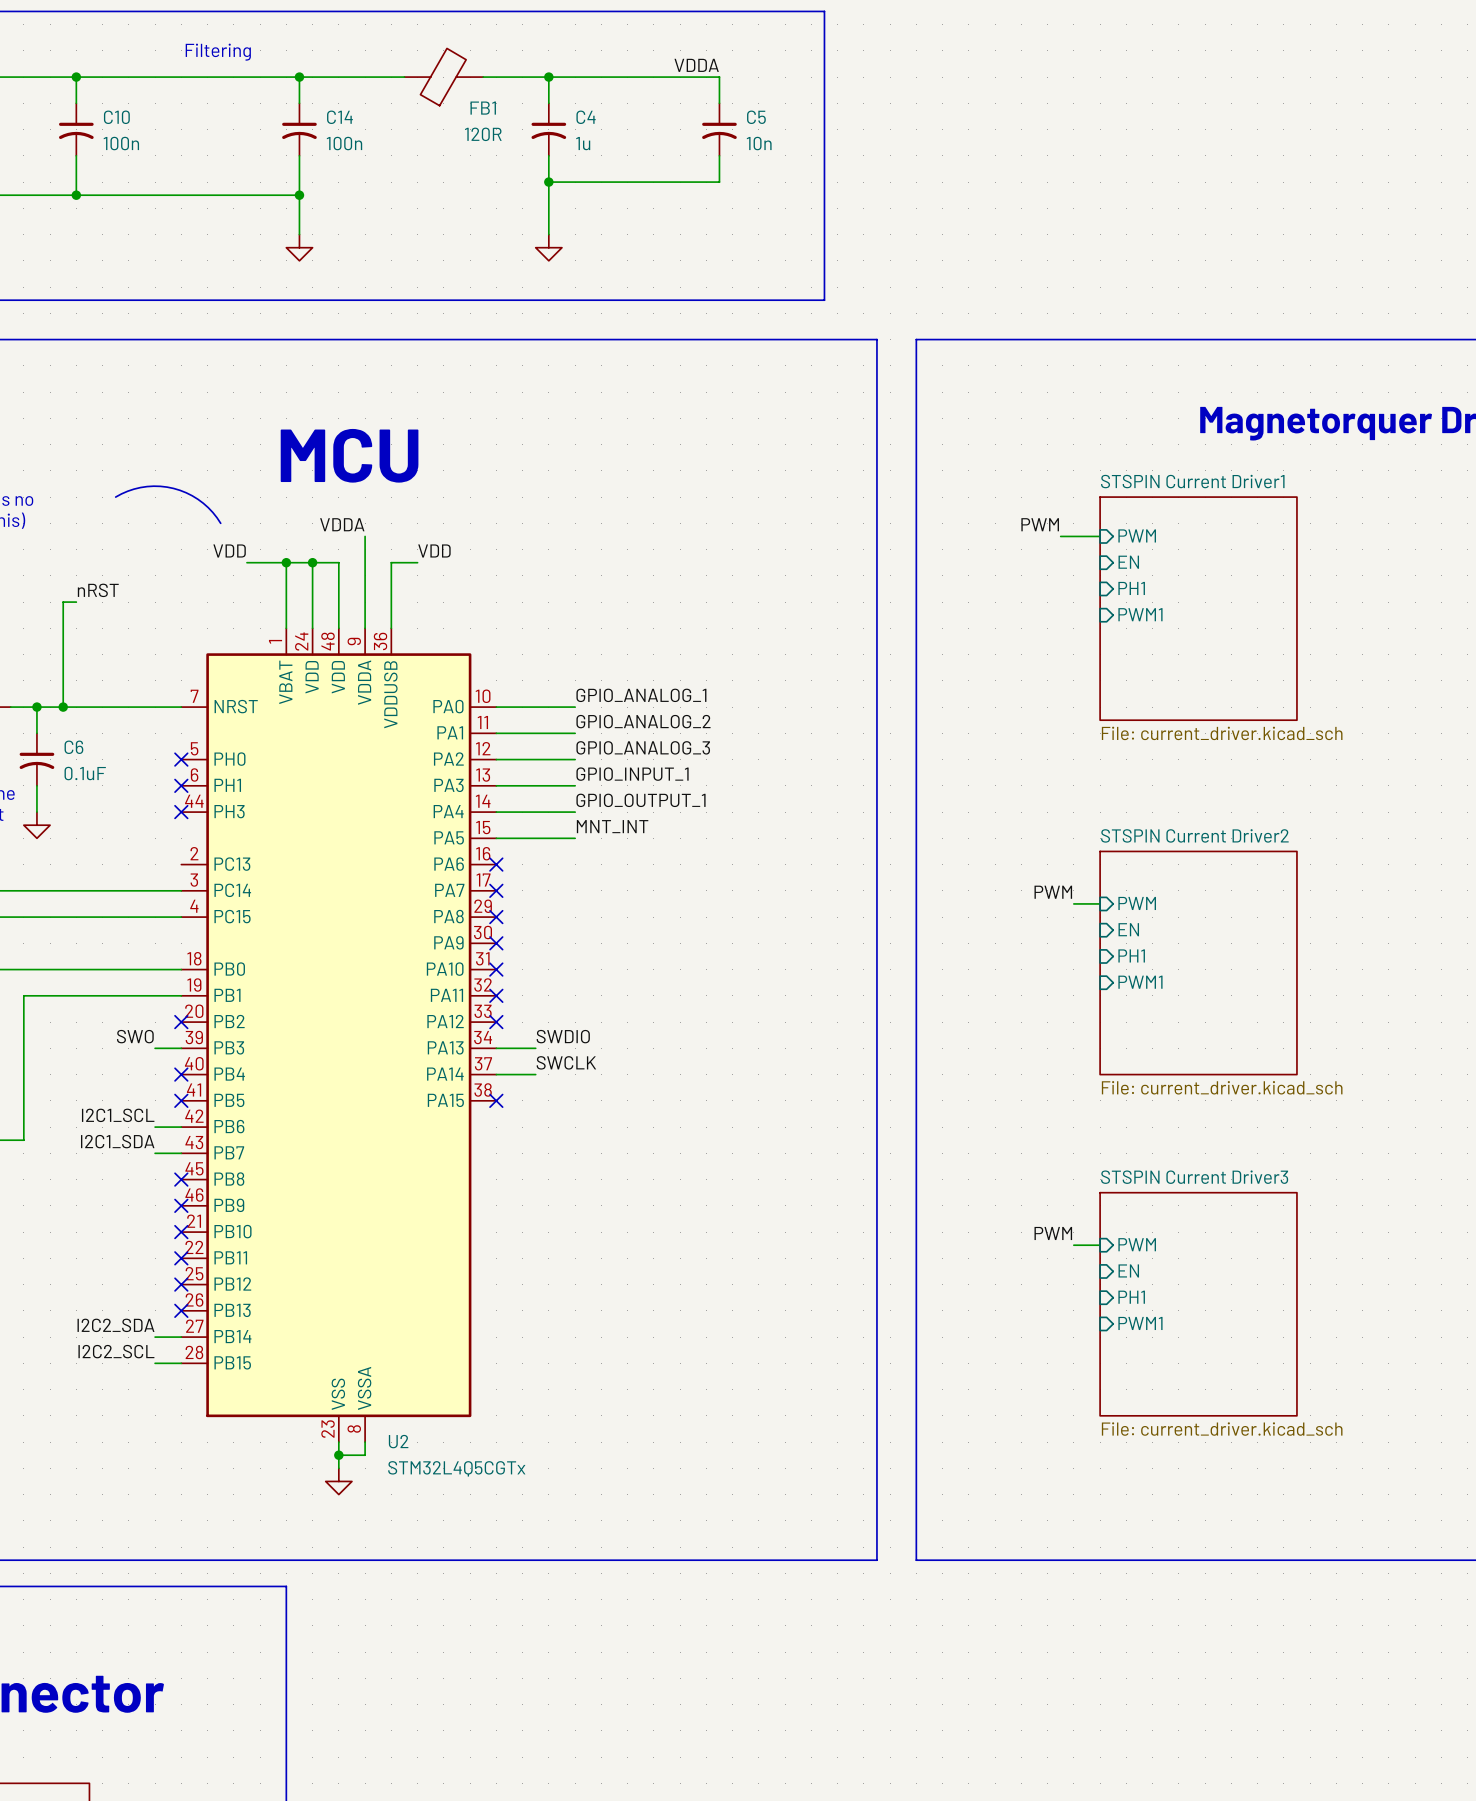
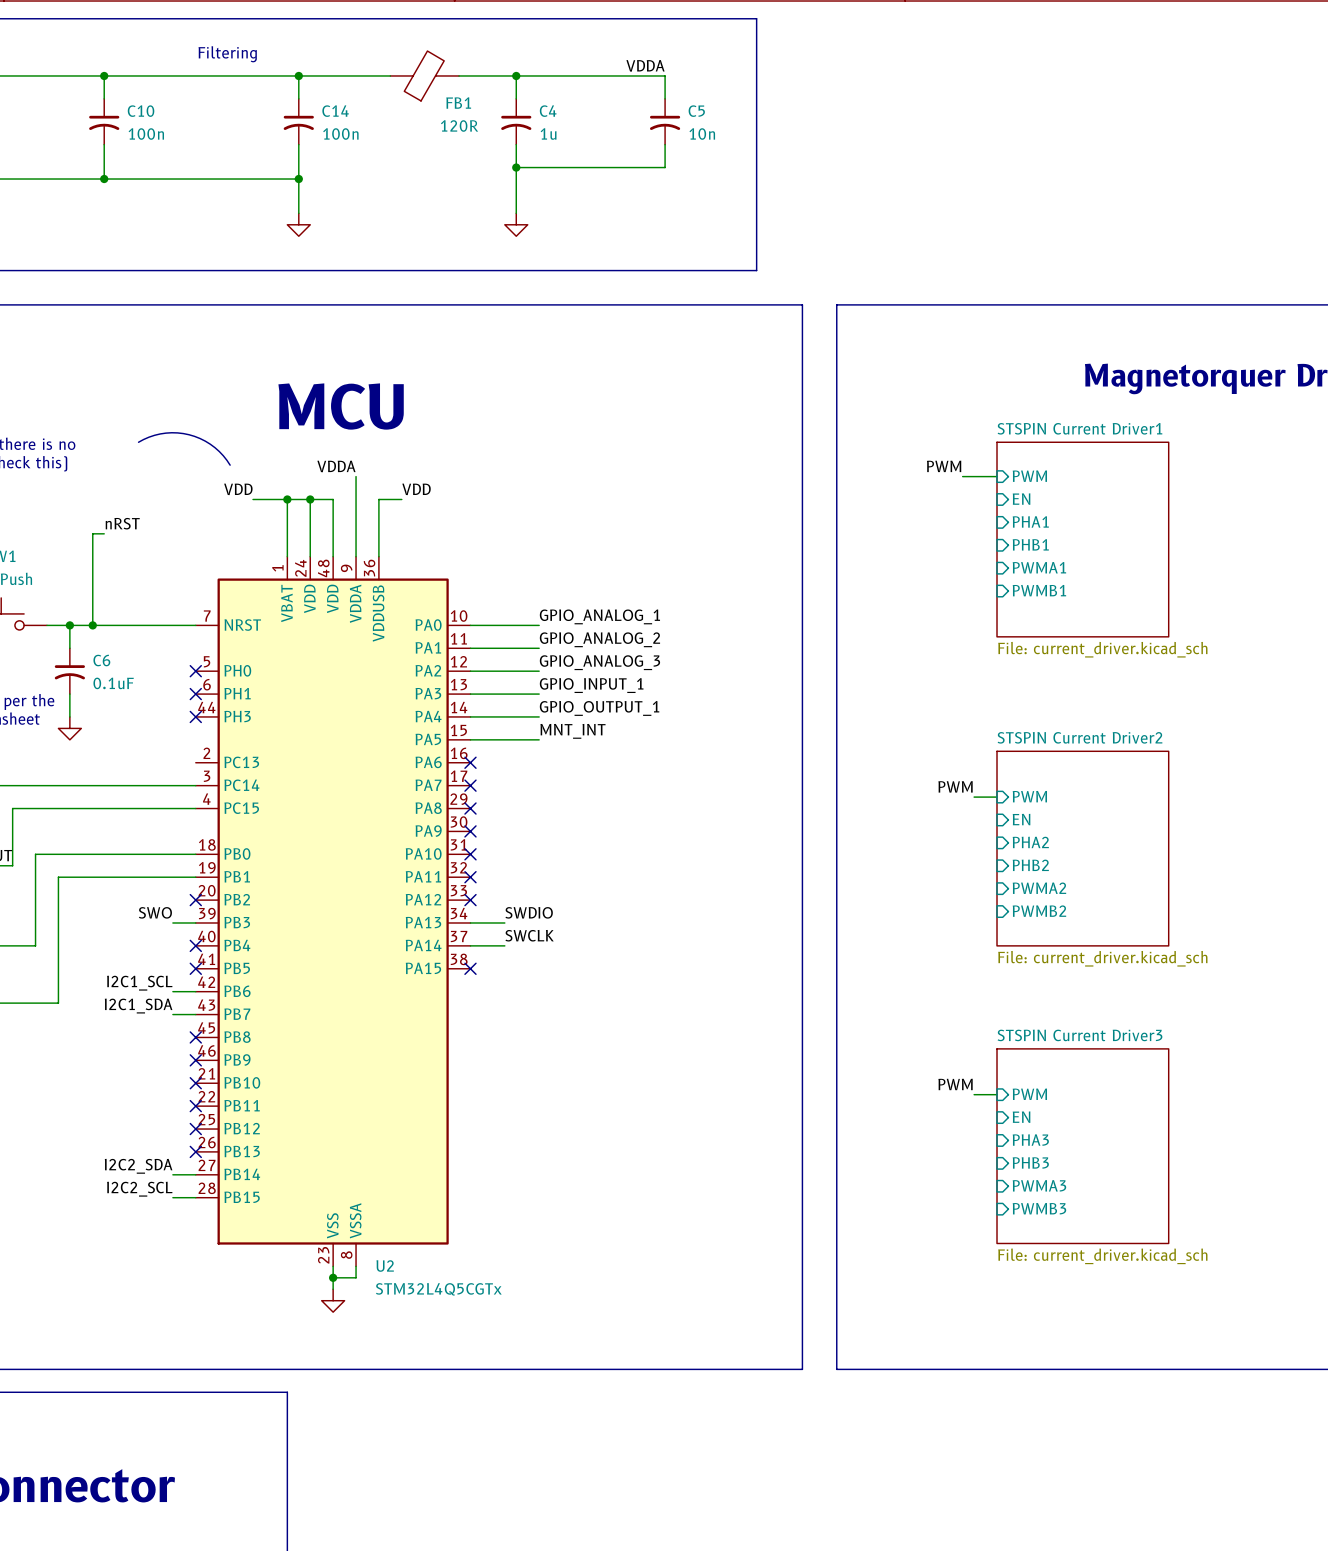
sheet pin: PH1 (1131, 588) -> PHA1 (1030, 521)
sheet pin: PWM1 (1140, 614) -> PHB1 (1030, 544)
sheet pin: none -> PWMA1 (1039, 567)
sheet pin: none -> PWMB1 (1039, 590)
sheet pin: PH1 (1131, 955) -> PHA2 (1030, 842)
sheet pin: PWM1 (1140, 982) -> PHB2 (1030, 865)
sheet pin: none -> PWMA2 (1039, 888)
sheet pin: none -> PWMB2 (1039, 911)
sheet pin: PH1 (1131, 1297) -> PHA3 (1030, 1140)
sheet pin: PWM1 (1140, 1323) -> PHB3 (1030, 1162)
sheet pin: none -> PWMA3 (1039, 1185)
sheet pin: none -> PWMB3 (1039, 1208)

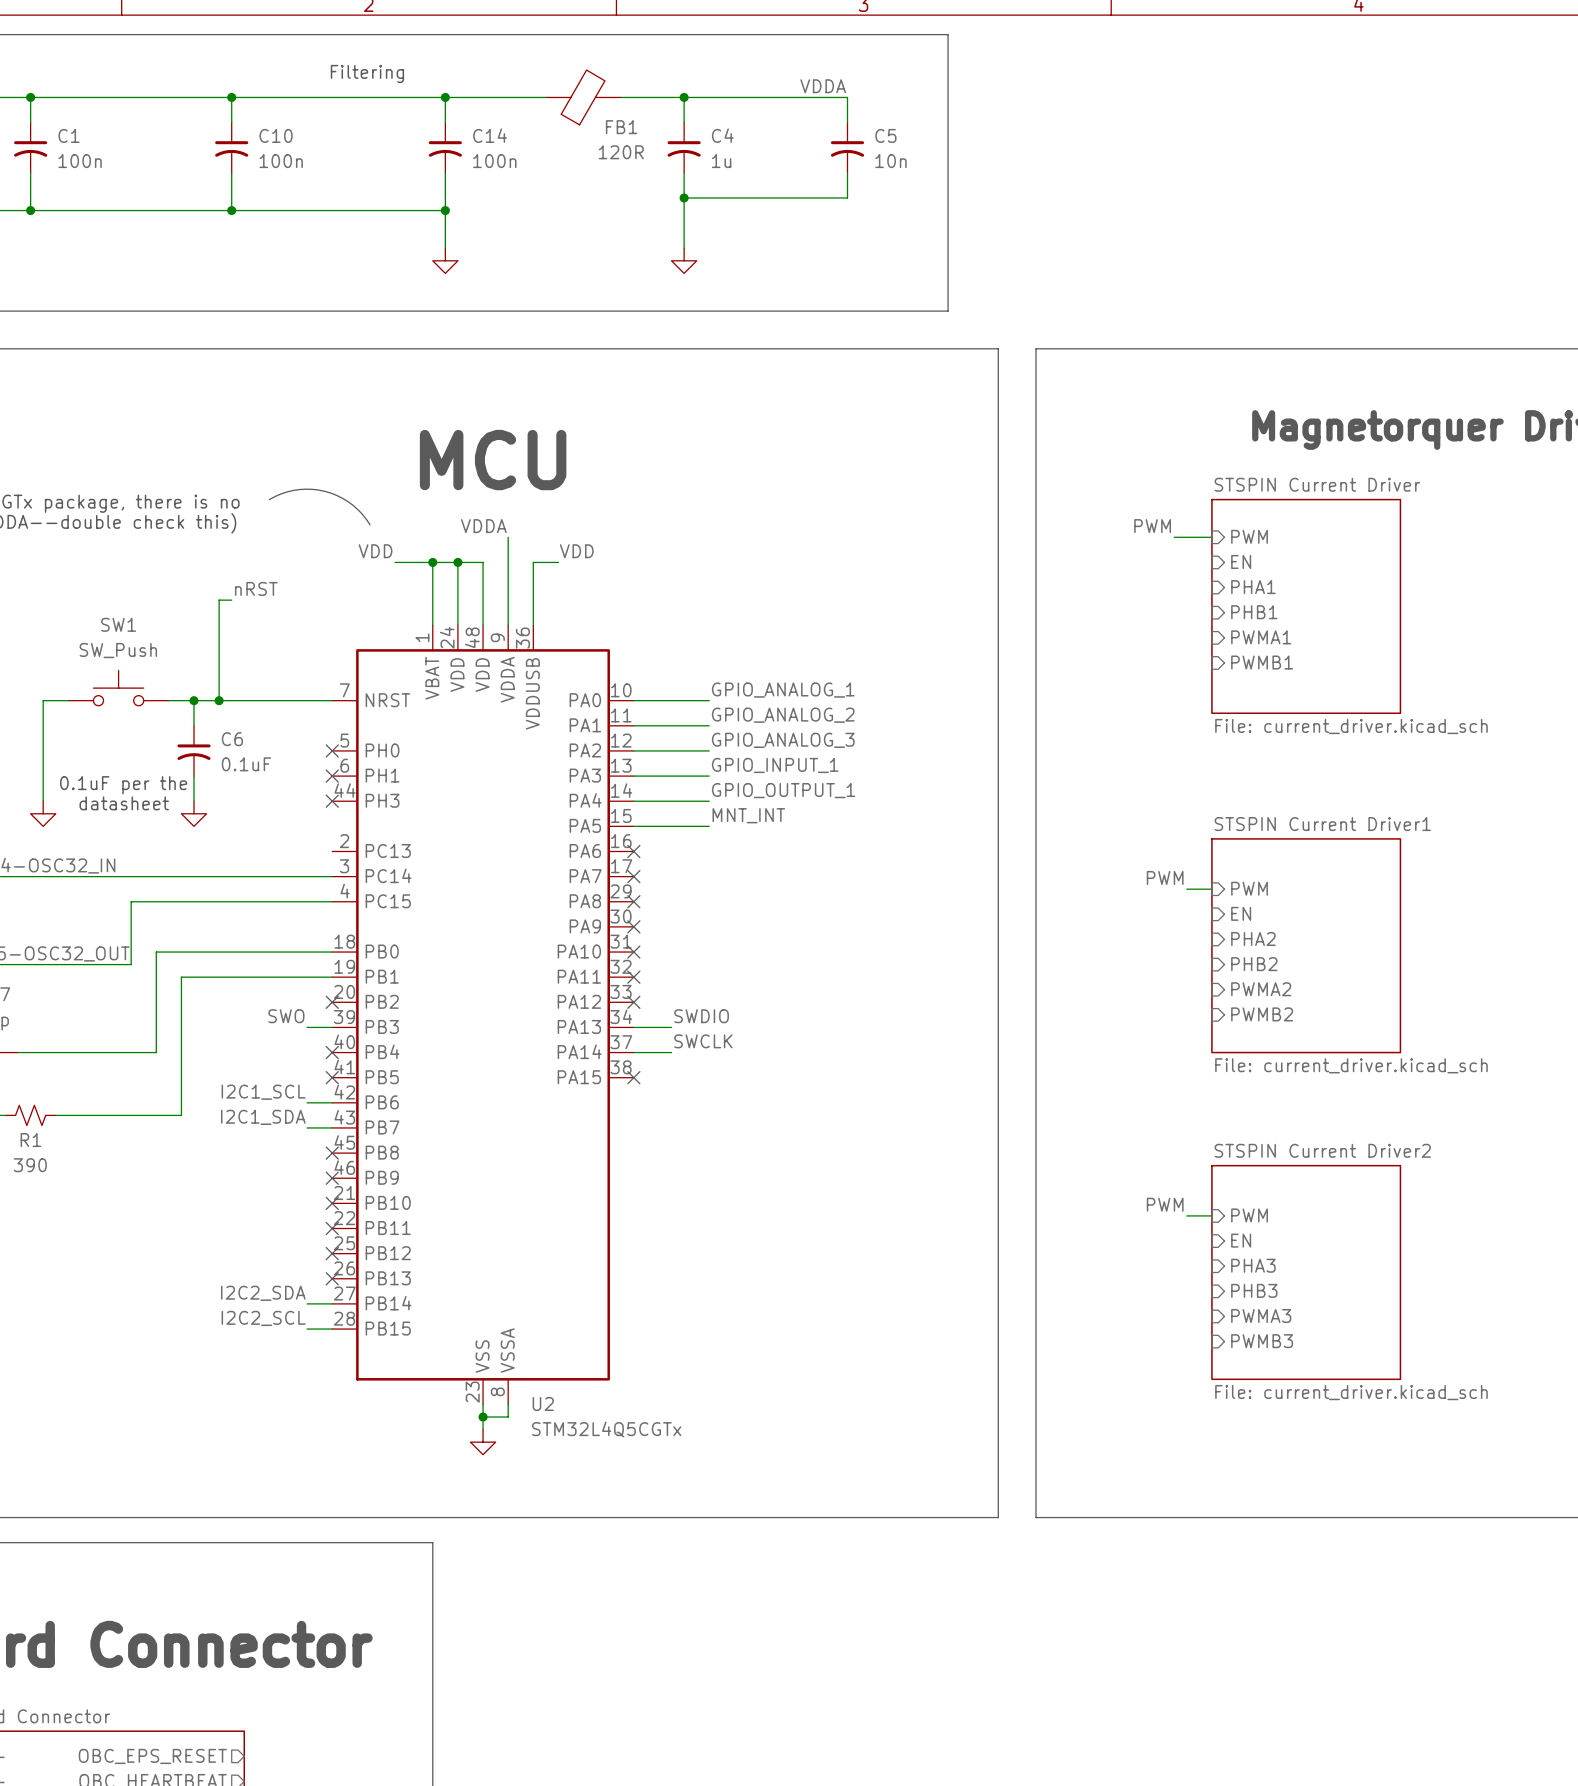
sheet STSPIN Current Driver1 name: STSPIN Current Driver1 (1079, 428) -> STSPIN Current Driver (1317, 484)
sheet STSPIN Current Driver2 name: STSPIN Current Driver2 (1079, 737) -> STSPIN Current Driver1 (1322, 824)
sheet STSPIN Current Driver3 name: STSPIN Current Driver3 (1079, 1035) -> STSPIN Current Driver2 (1322, 1150)

